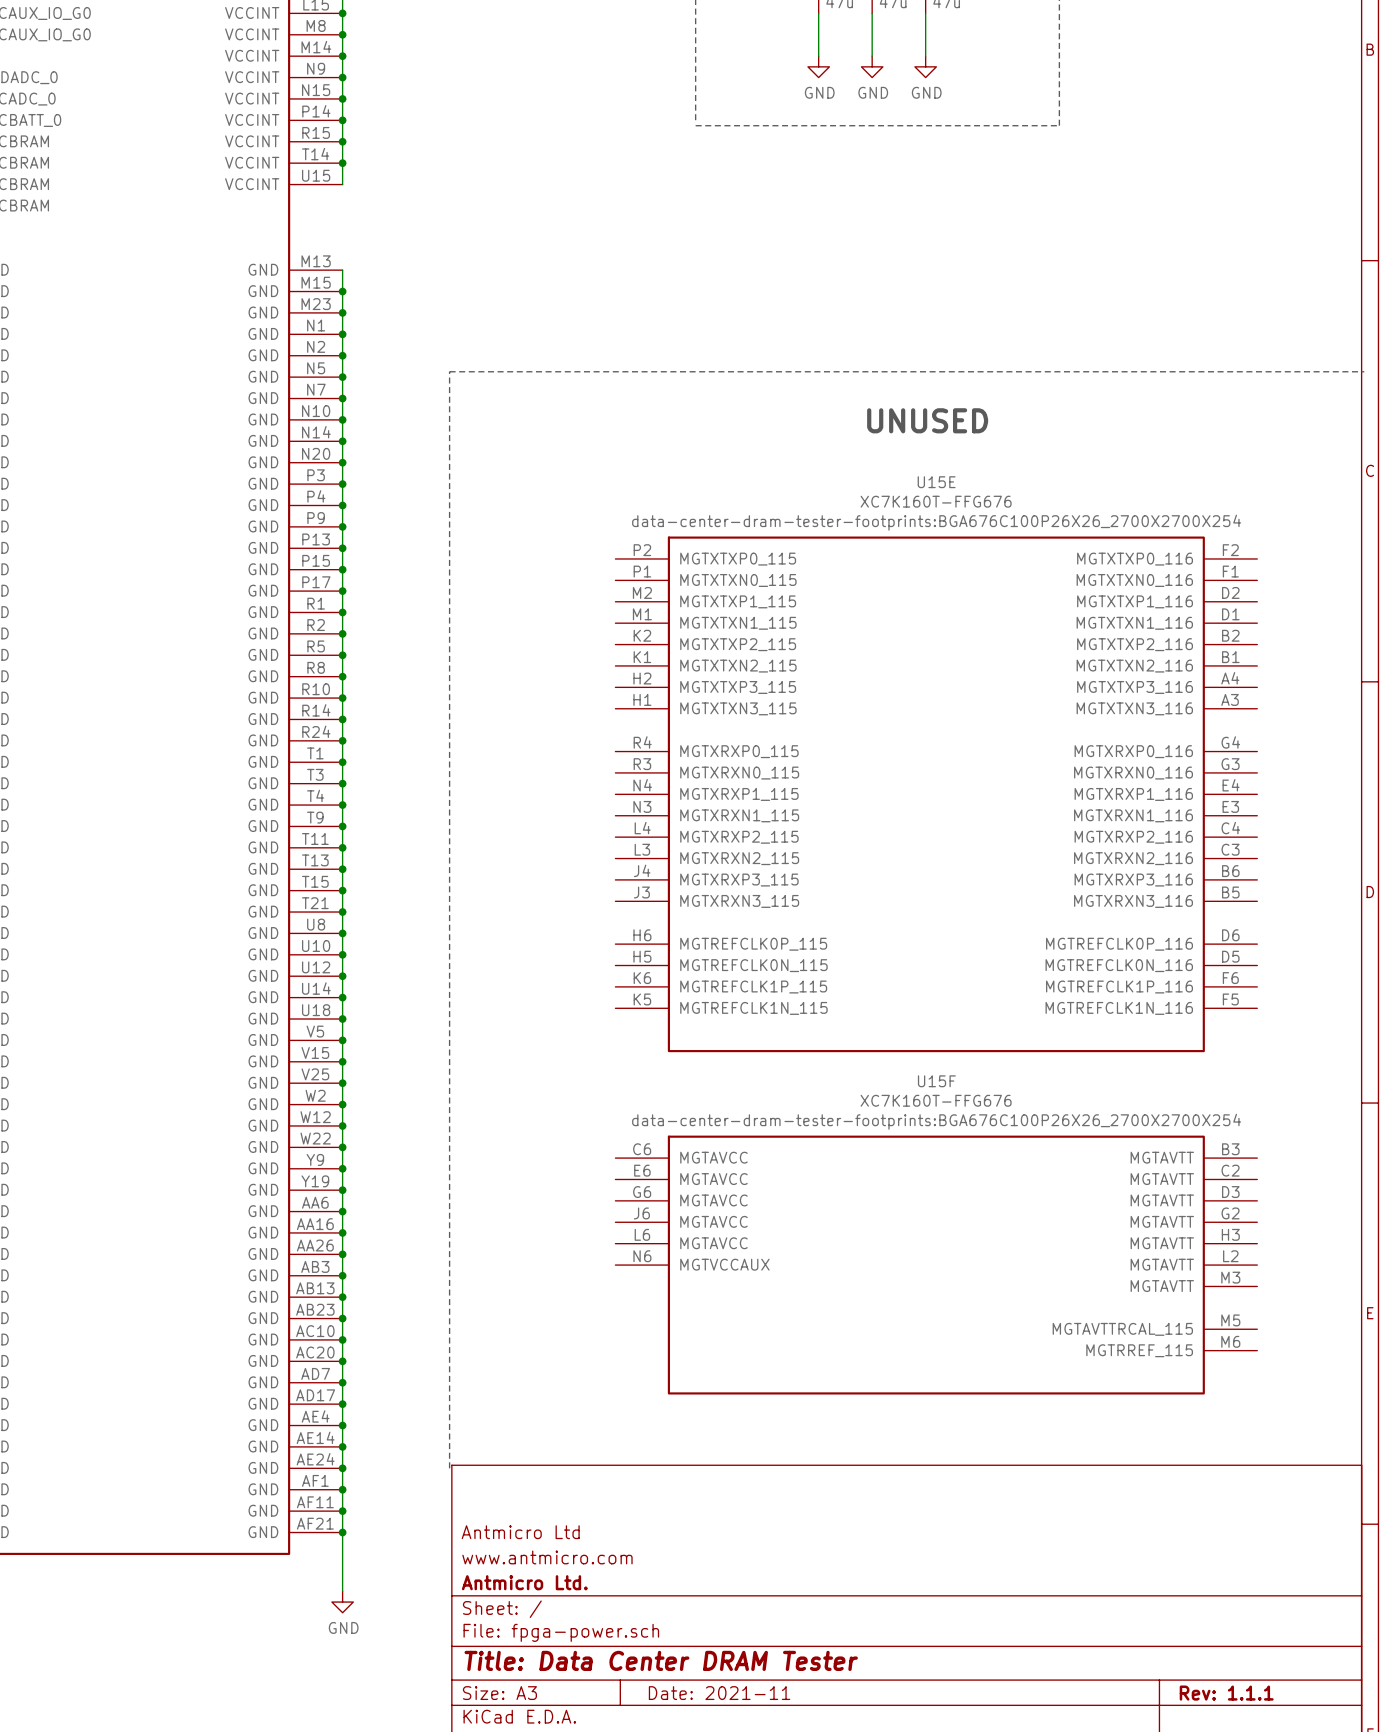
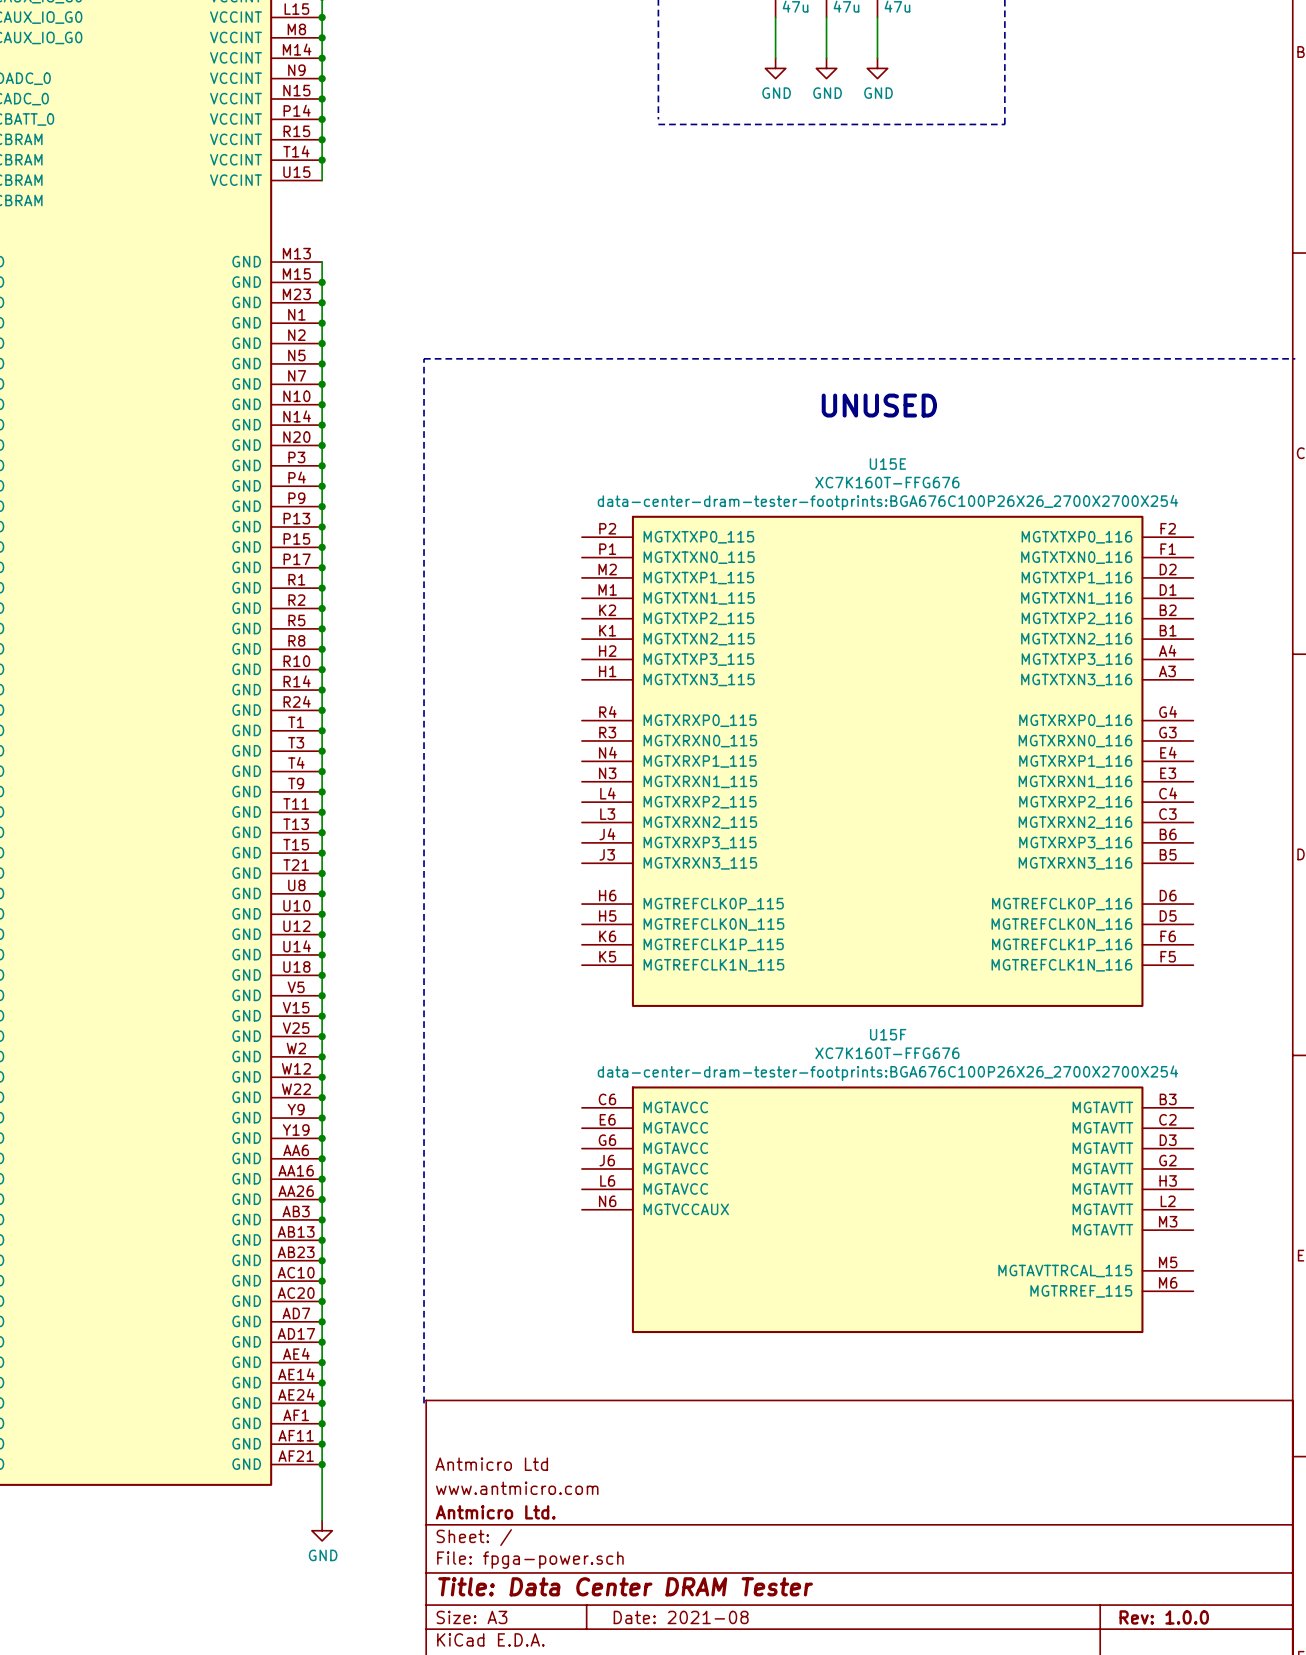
title block: Date: 2021-11 (719, 1693) -> Date: 2021-08 (681, 1617)
title block: Rev: 1.1.1 (1226, 1693) -> Rev: 1.0.0 (1164, 1617)

